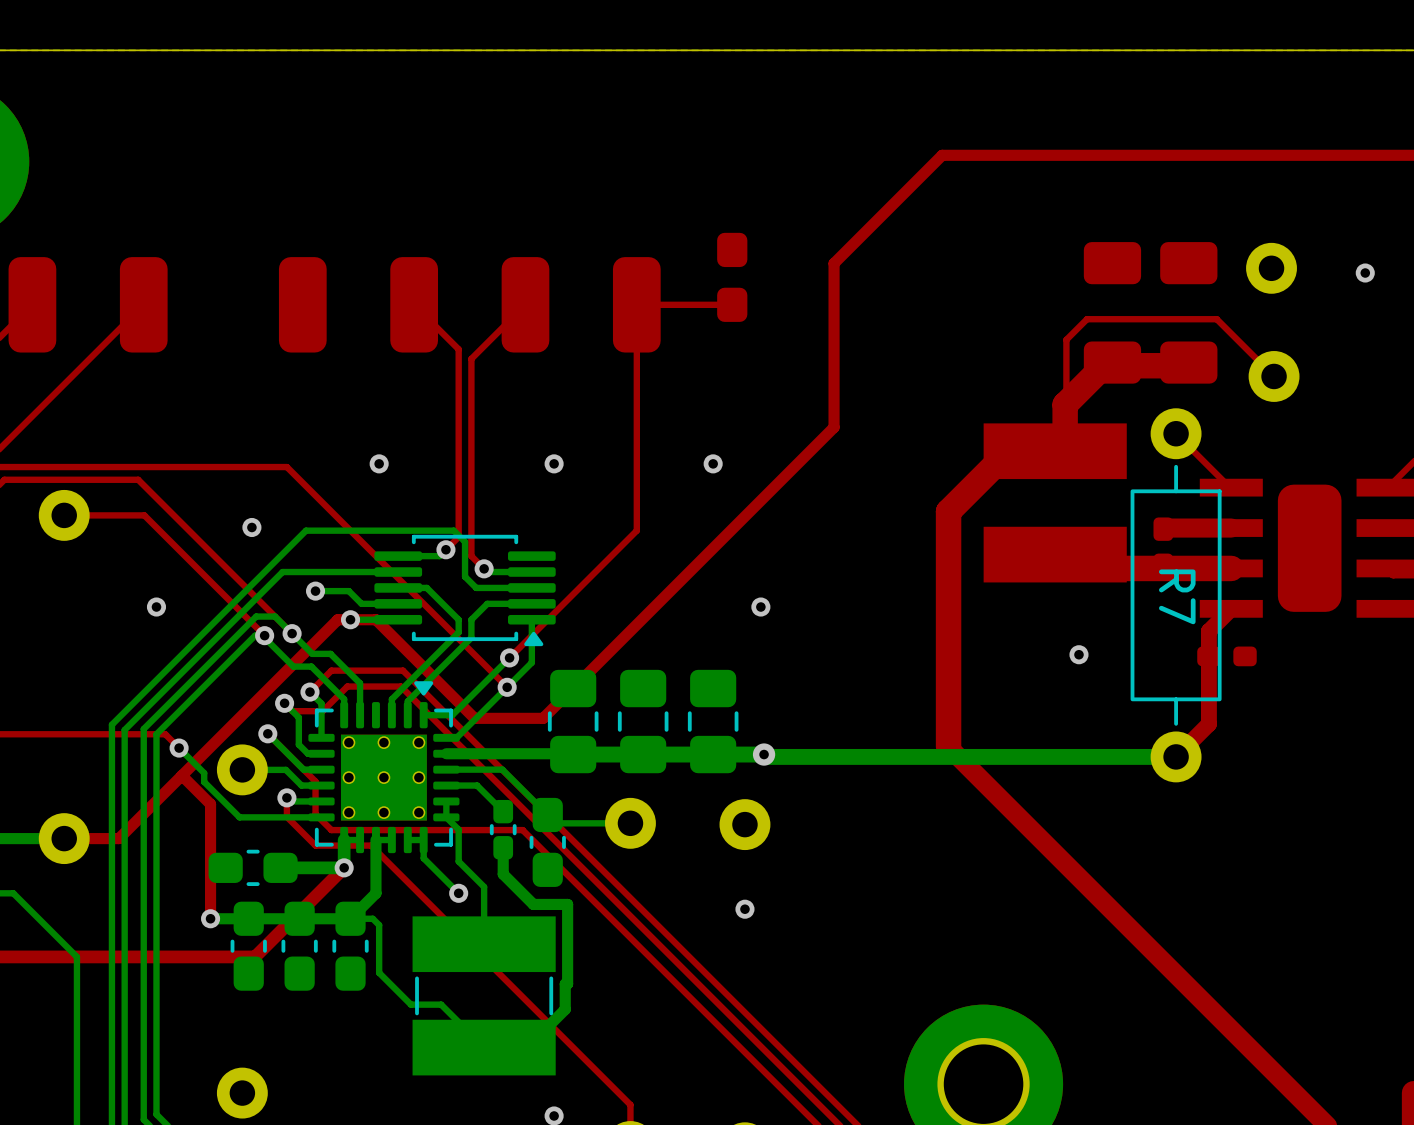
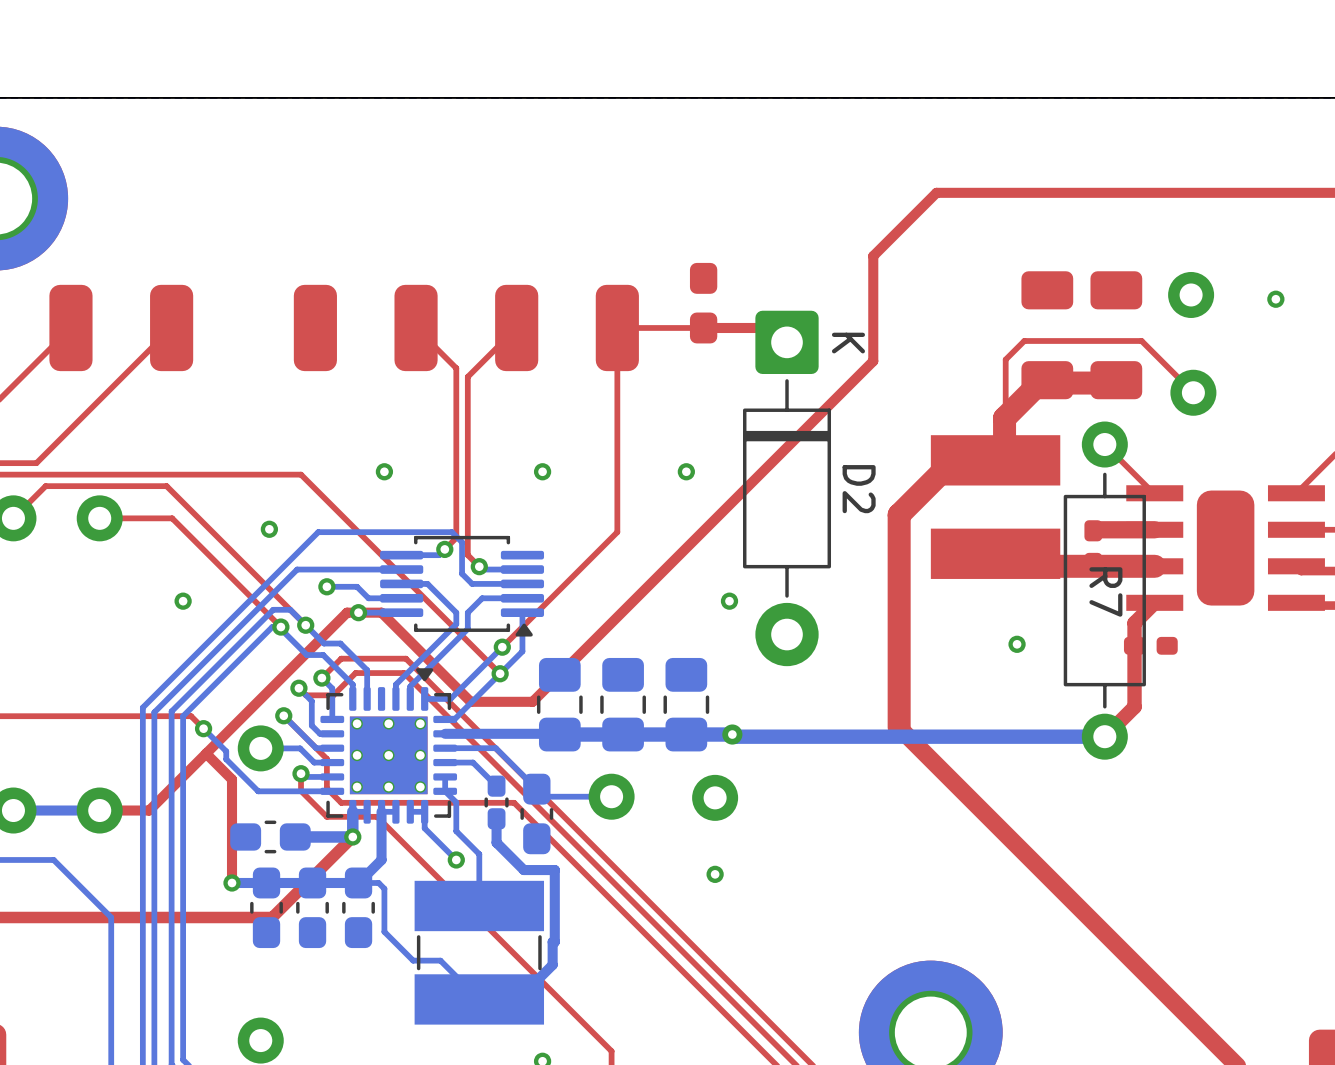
top track: (989, 155) (942, 155) (834, 263) (834, 427) -> (936, 192) (873, 256) (873, 361) (795, 438)
top track: none -> (703, 327) (772, 327) (787, 342)
D2: none -> (787, 488)

